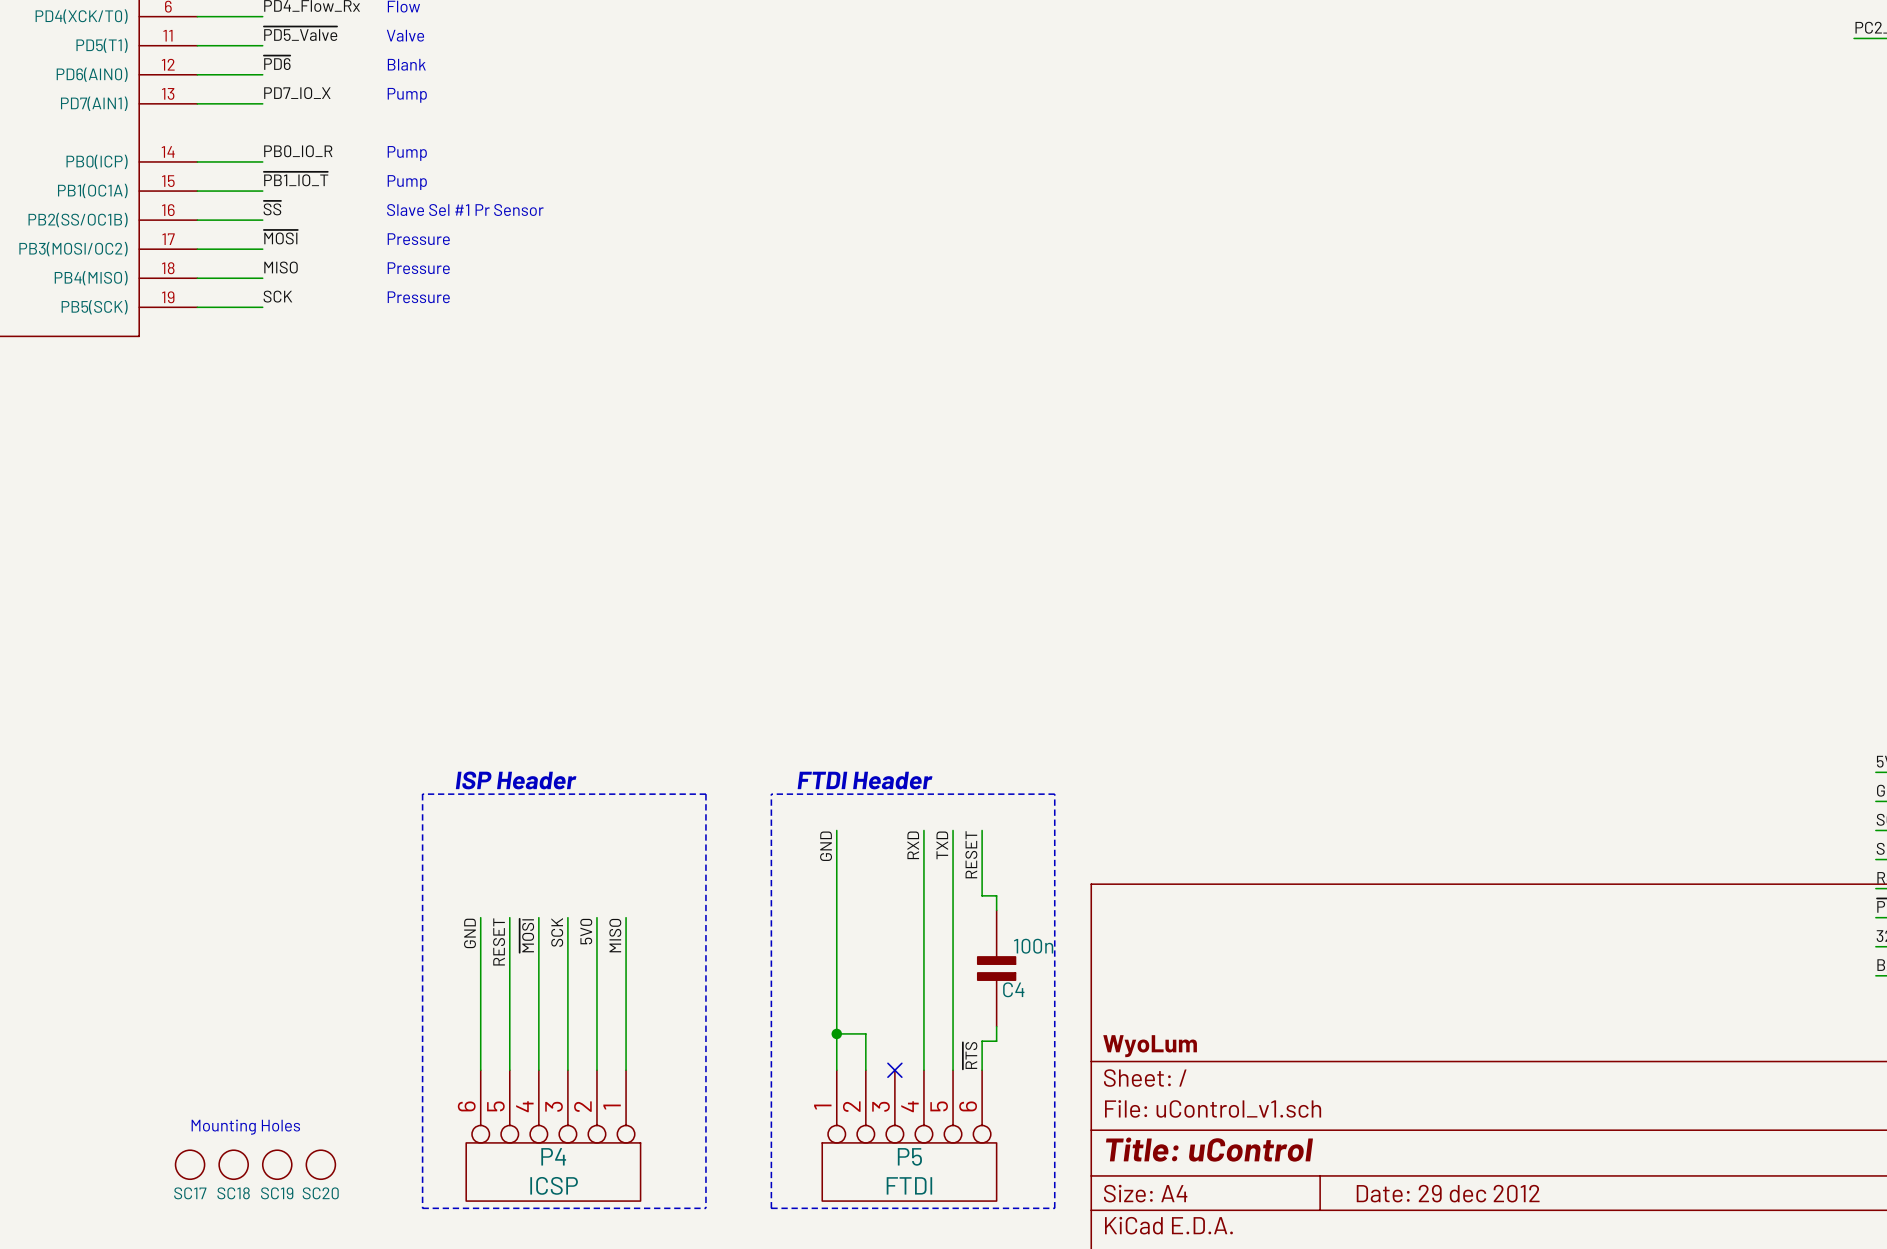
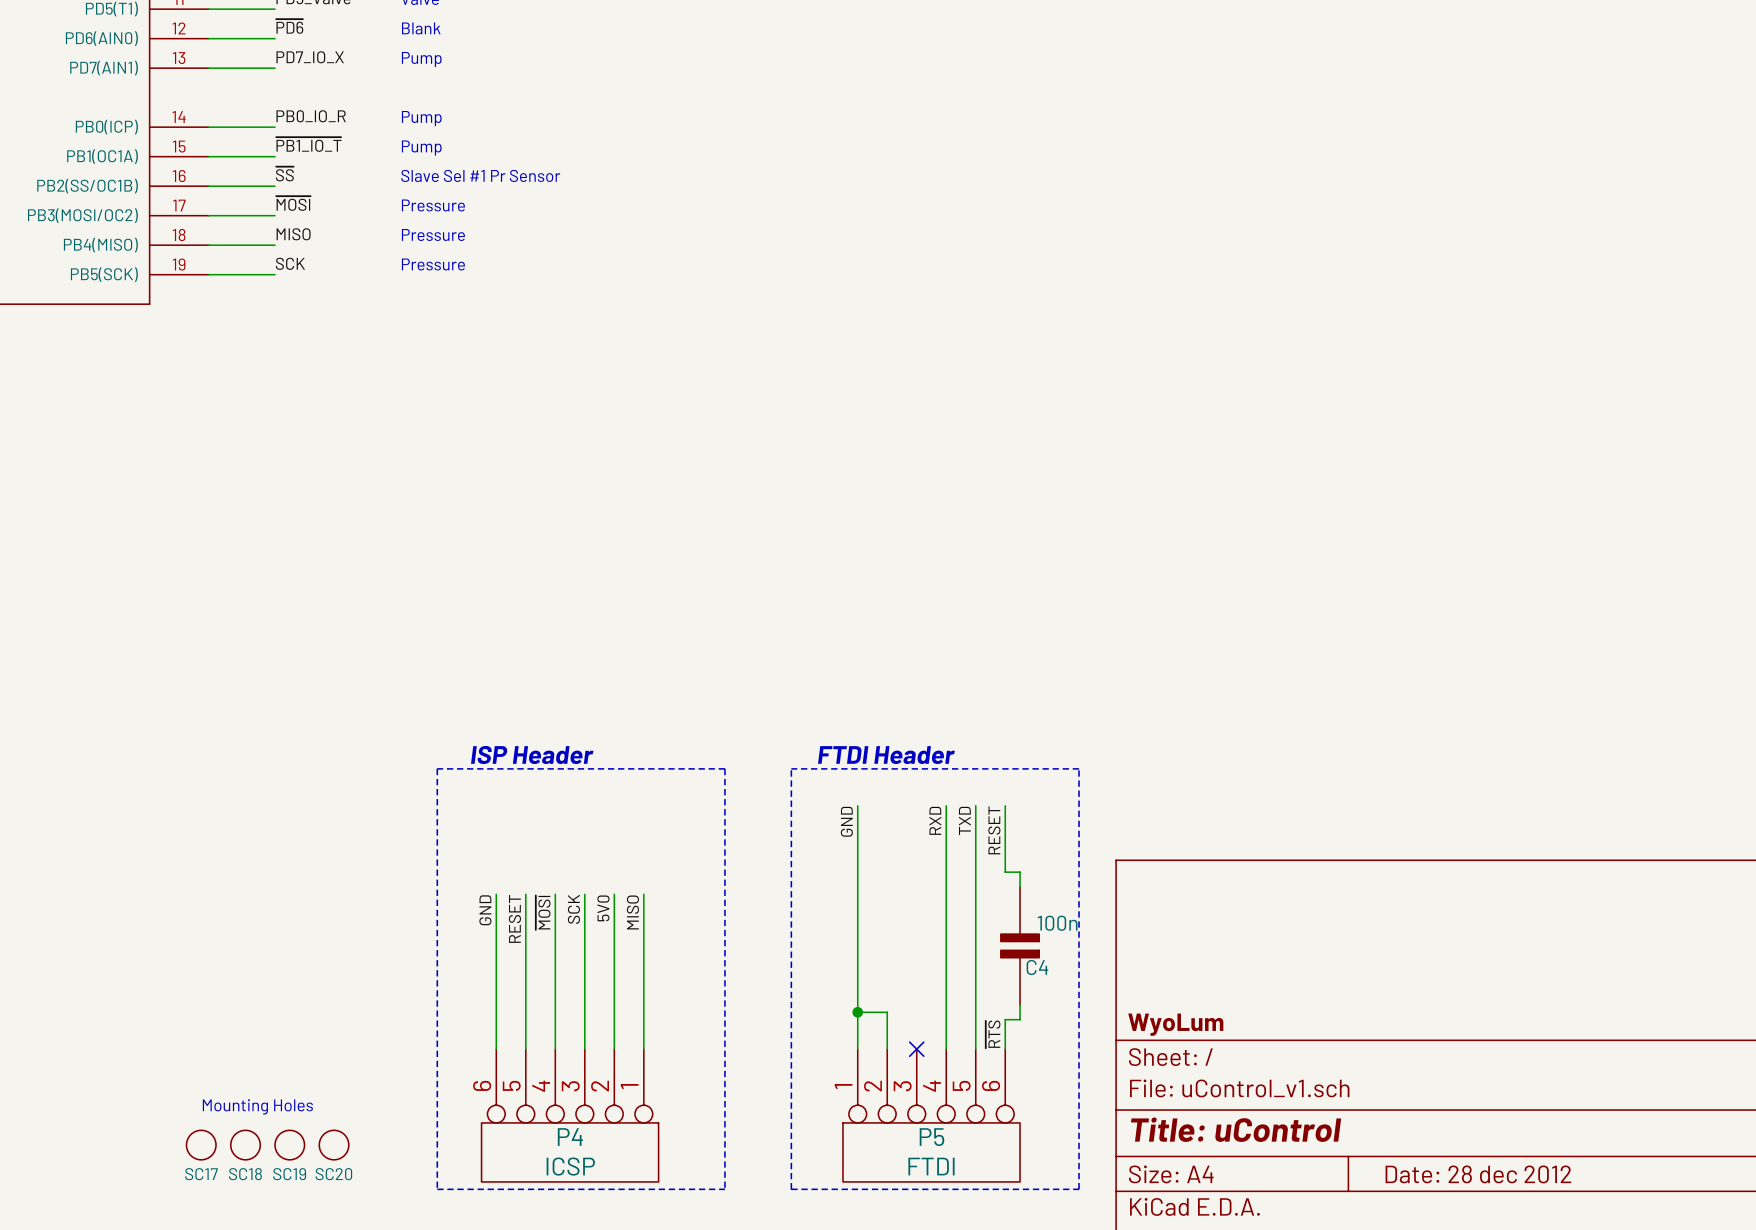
title block: Date: 29 dec 2012 (1448, 1193) -> Date: 28 dec 2012 (1478, 1174)

